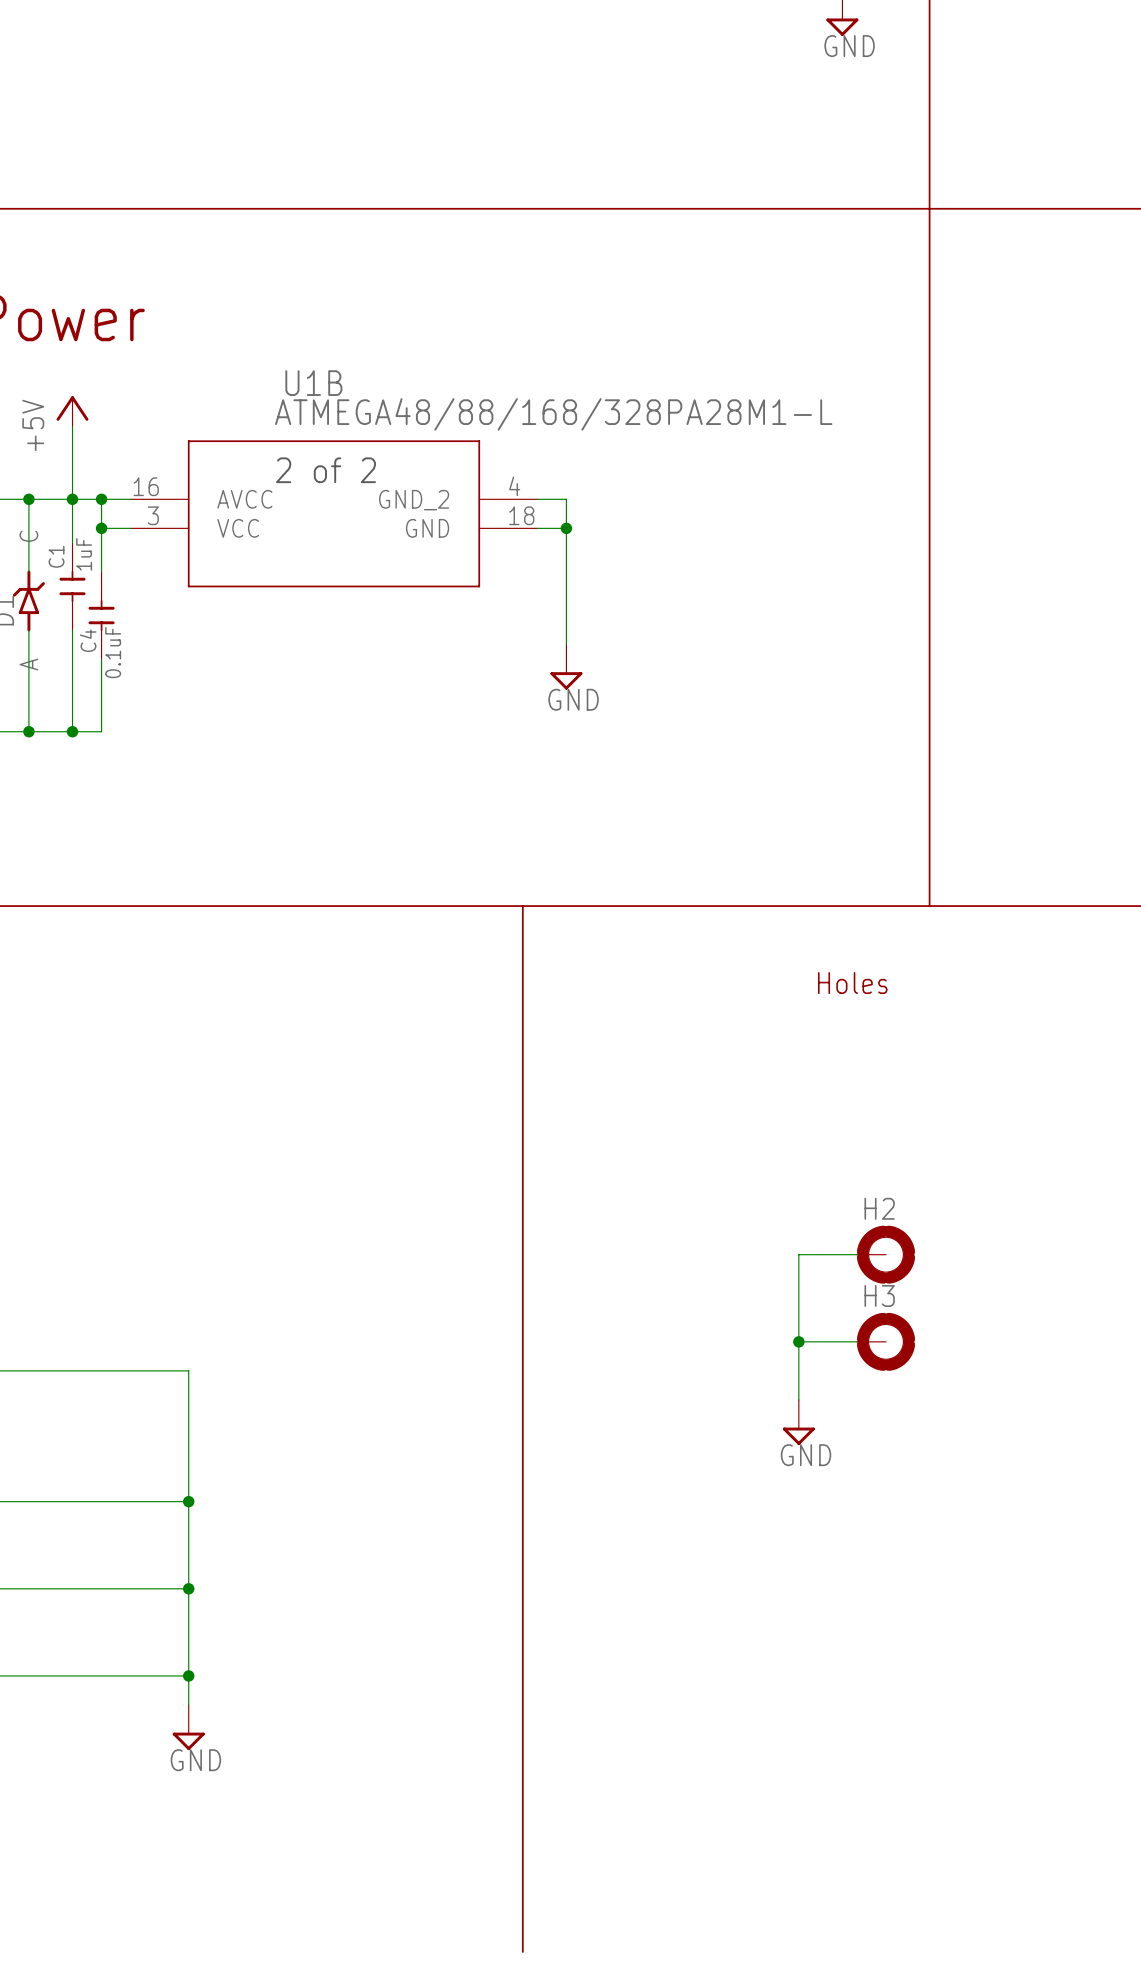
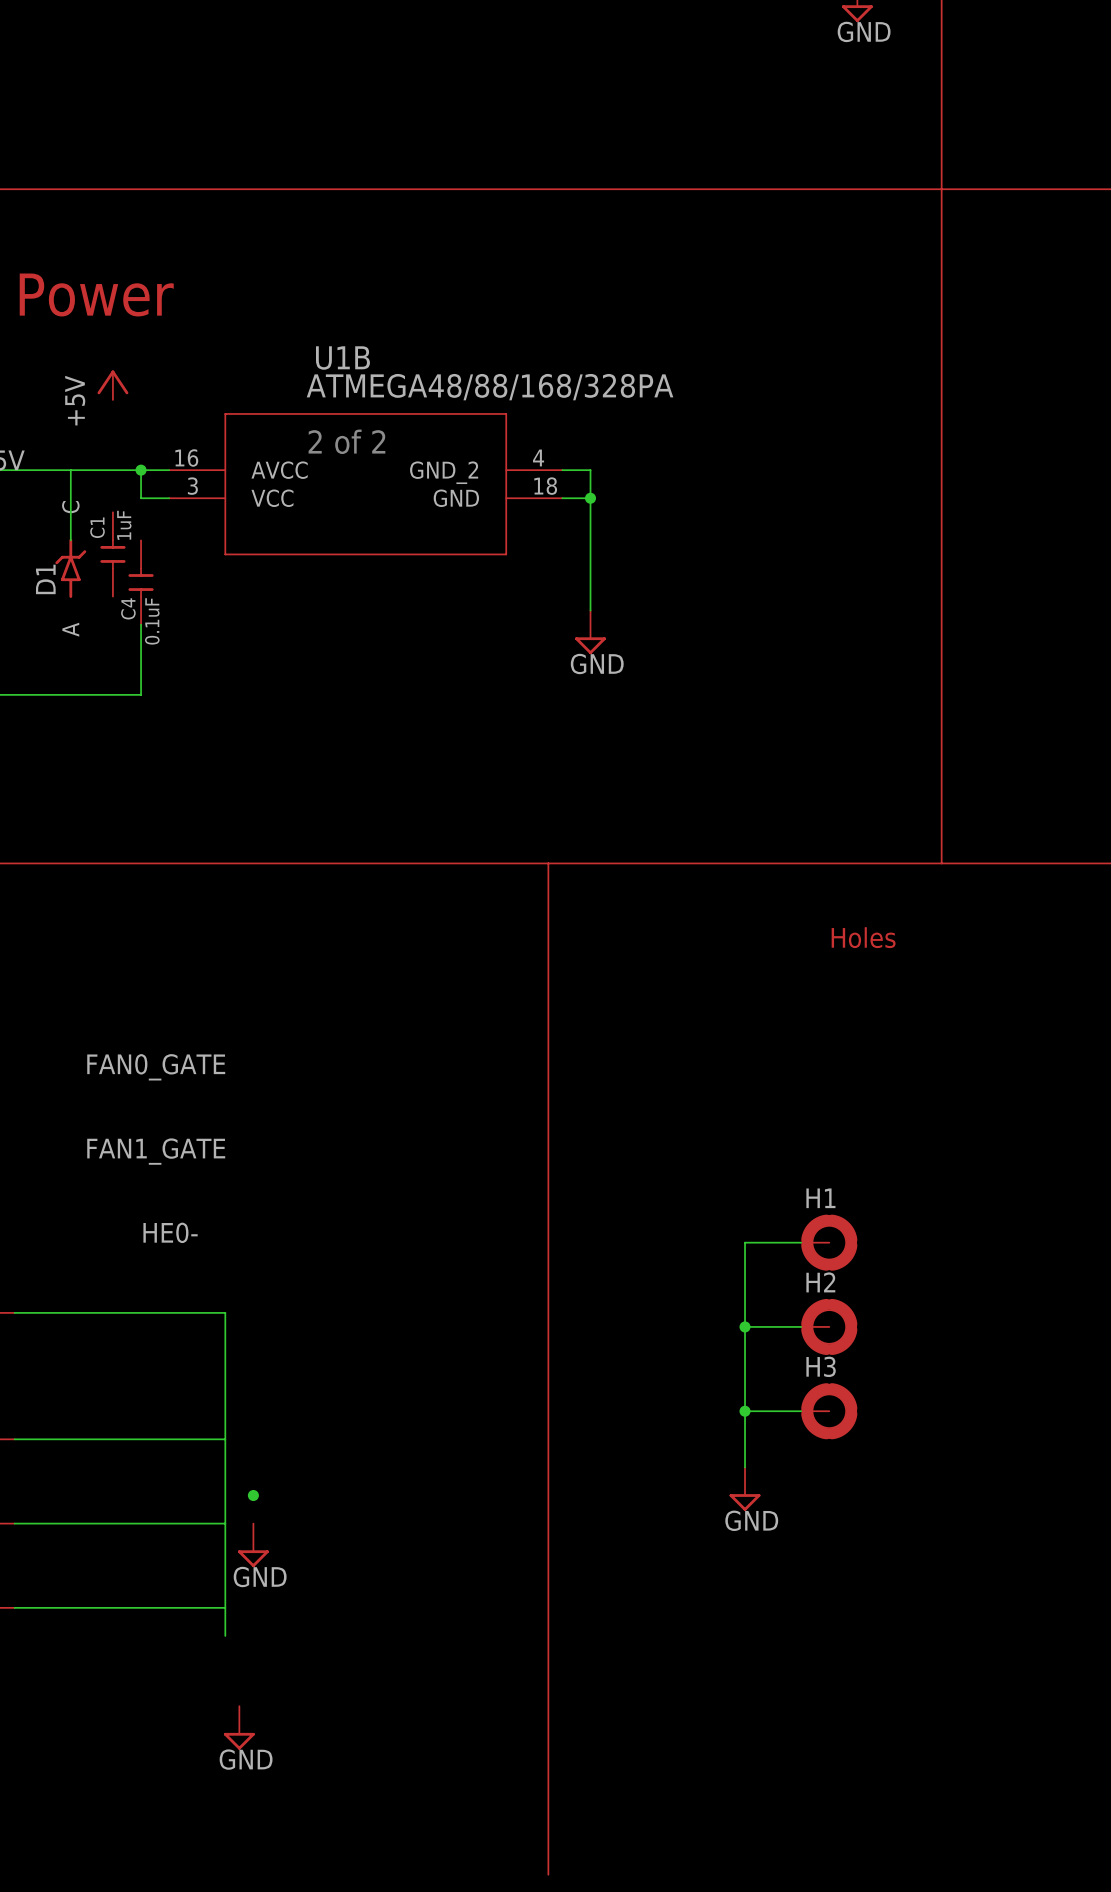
U1B value: ATMEGA48/88/168/328PA28M1-L (553, 414) -> ATMEGA48/88/168/328PA (490, 387)
wire: (72, 426) (72, 542) -> none
junction: (28, 499) -> none
junction: (72, 499) -> none
wire: (101, 528) (101, 571) -> none
junction: (101, 528) -> none
wire: (28, 630) (28, 731) -> none
wire: (72, 630) (72, 731) -> none
junction: (28, 731) -> none
junction: (72, 731) -> none
label: none -> FAN0_GATE (156, 1067)
label: none -> FAN1_GATE (156, 1151)
wire: (856, 1254) (798, 1254) (798, 1399) -> none
H2 position: (886, 1254) -> (829, 1326)
label: none -> HE0- (170, 1232)
wire: none -> (801, 1242) (745, 1242) (745, 1467)
H1: none -> (829, 1242)
wire: (798, 1341) (856, 1341) -> (745, 1326) (801, 1326)
junction: (798, 1341) -> none
H3 position: (886, 1341) -> (829, 1411)
junction: none -> (745, 1326)
power symbol position: GND (798, 1422) -> GND (745, 1489)
wire: none -> (745, 1411) (801, 1411)
junction: none -> (745, 1411)
junction: (188, 1501) -> none
junction: none -> (253, 1495)
junction: (188, 1588) -> none
power symbol: none -> GND (253, 1545)
junction: (188, 1675) -> none
power symbol: GND (188, 1727) -> none
power symbol: none -> GND (239, 1727)

